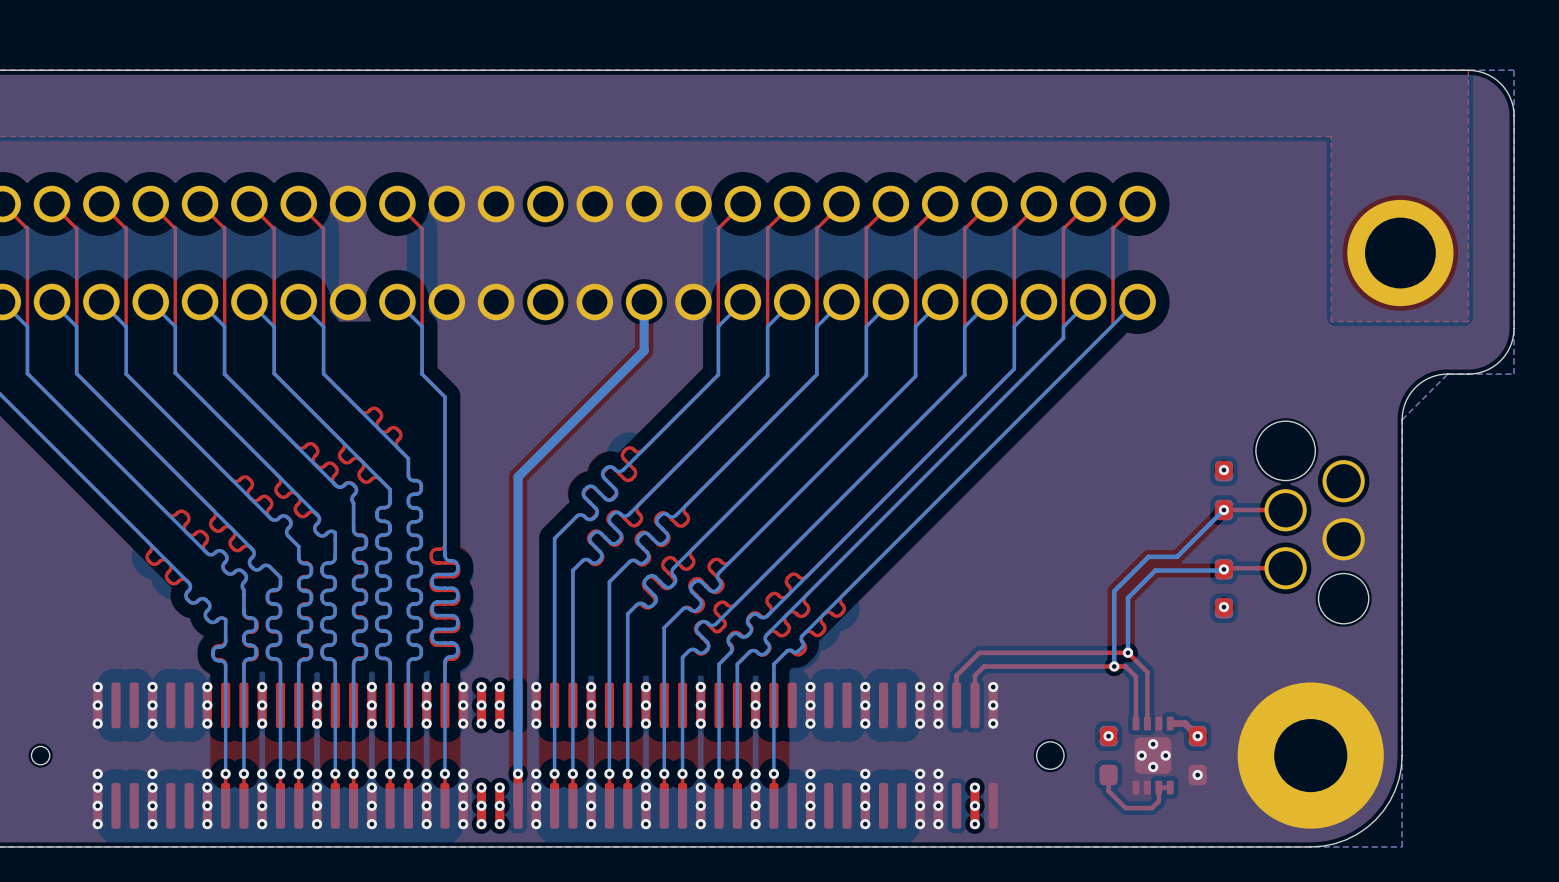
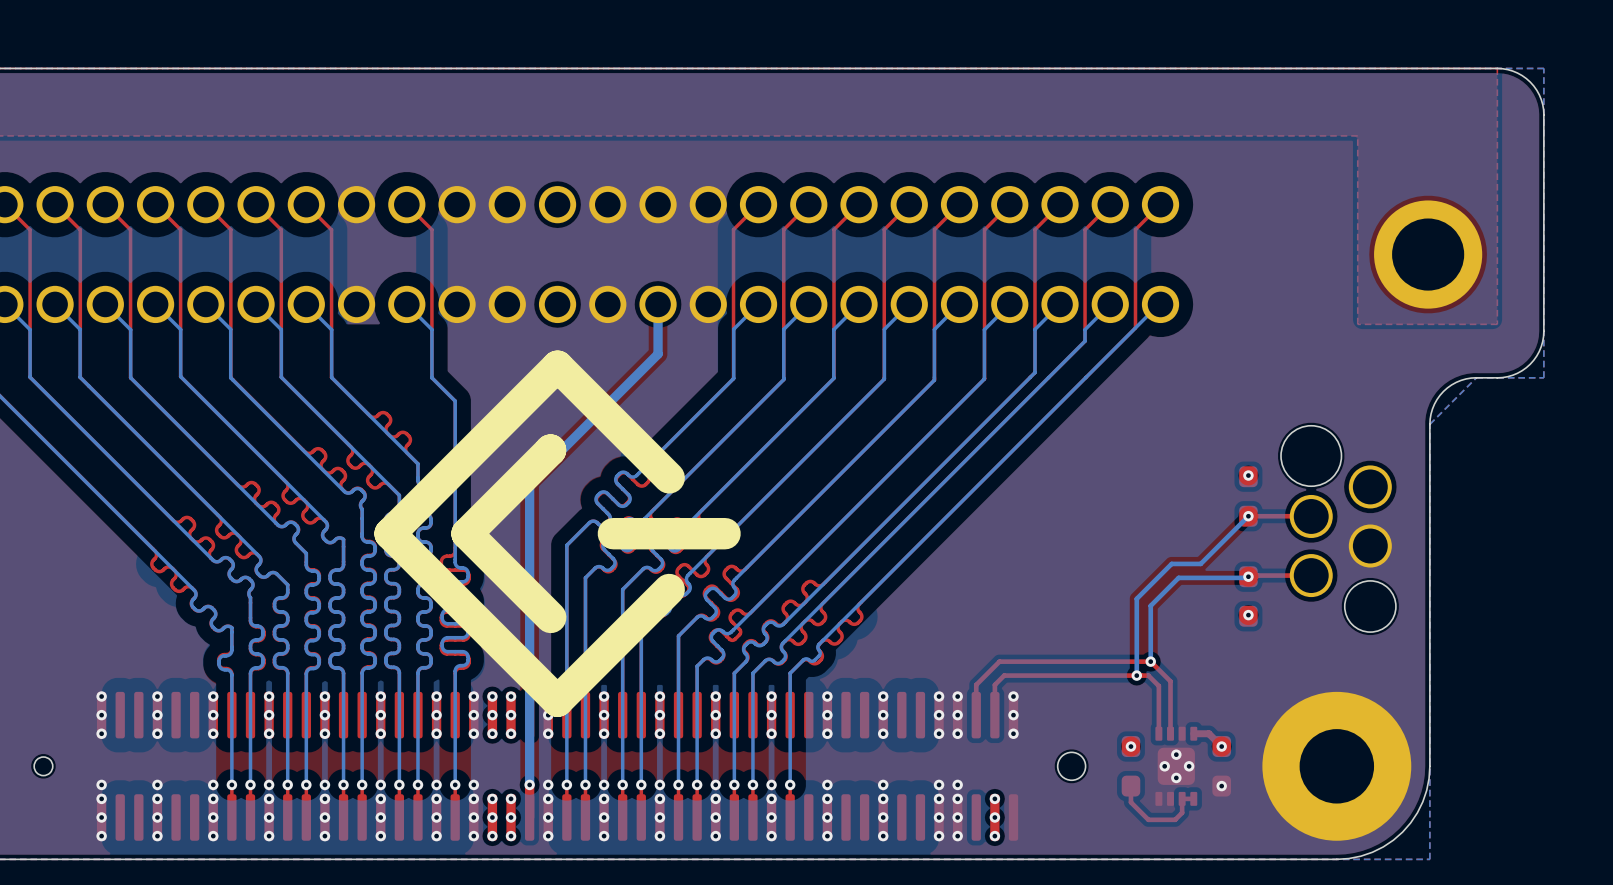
line: none -> (550, 450) (467, 533) (550, 617)
line: none -> (669, 477) (557, 366) (390, 533) (557, 701) (669, 589)
line: none -> (725, 533) (613, 533)

